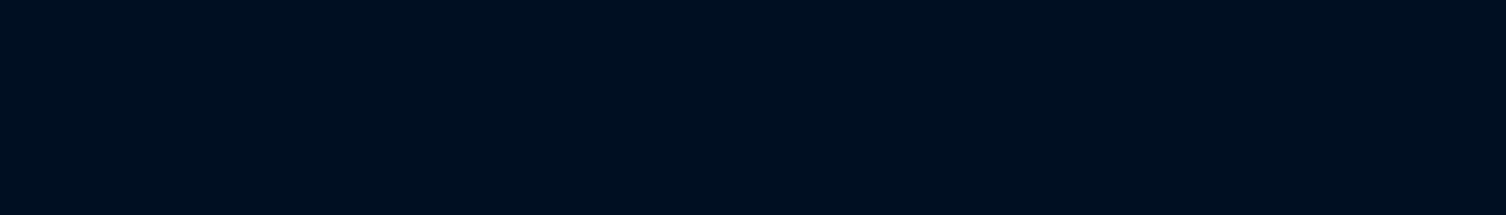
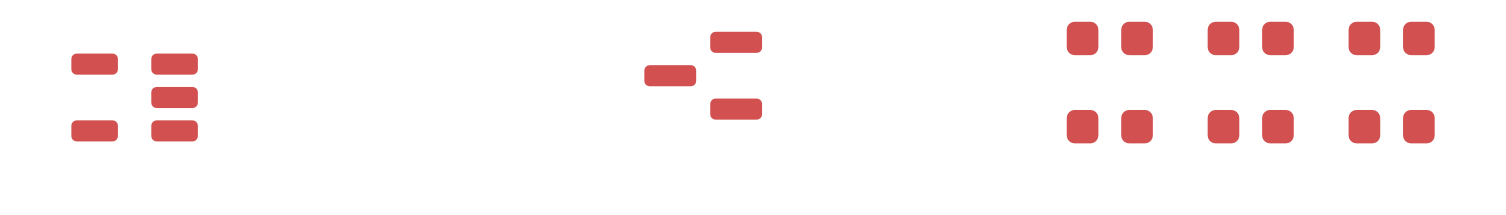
part: none -> (1109, 38)
part: none -> (1250, 38)
part: none -> (1391, 38)
part: none -> (703, 75)
part: none -> (134, 97)
part: none -> (1109, 126)
part: none -> (1250, 126)
part: none -> (1391, 126)

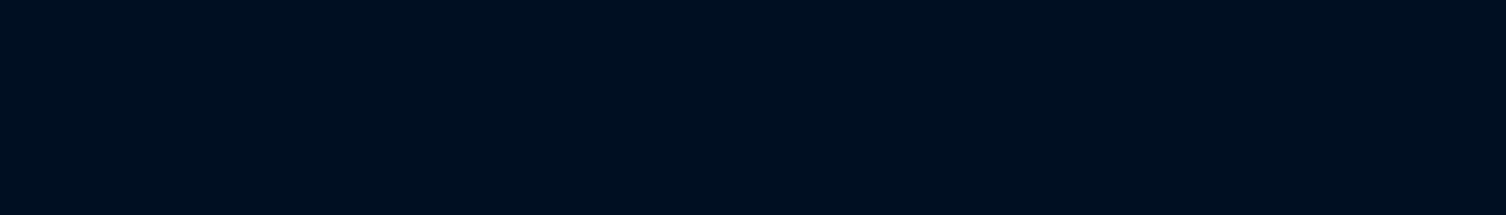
part: (1109, 38) -> none
part: (1250, 38) -> none
part: (1391, 38) -> none
part: (703, 75) -> none
part: (134, 97) -> none
part: (1109, 126) -> none
part: (1250, 126) -> none
part: (1391, 126) -> none

